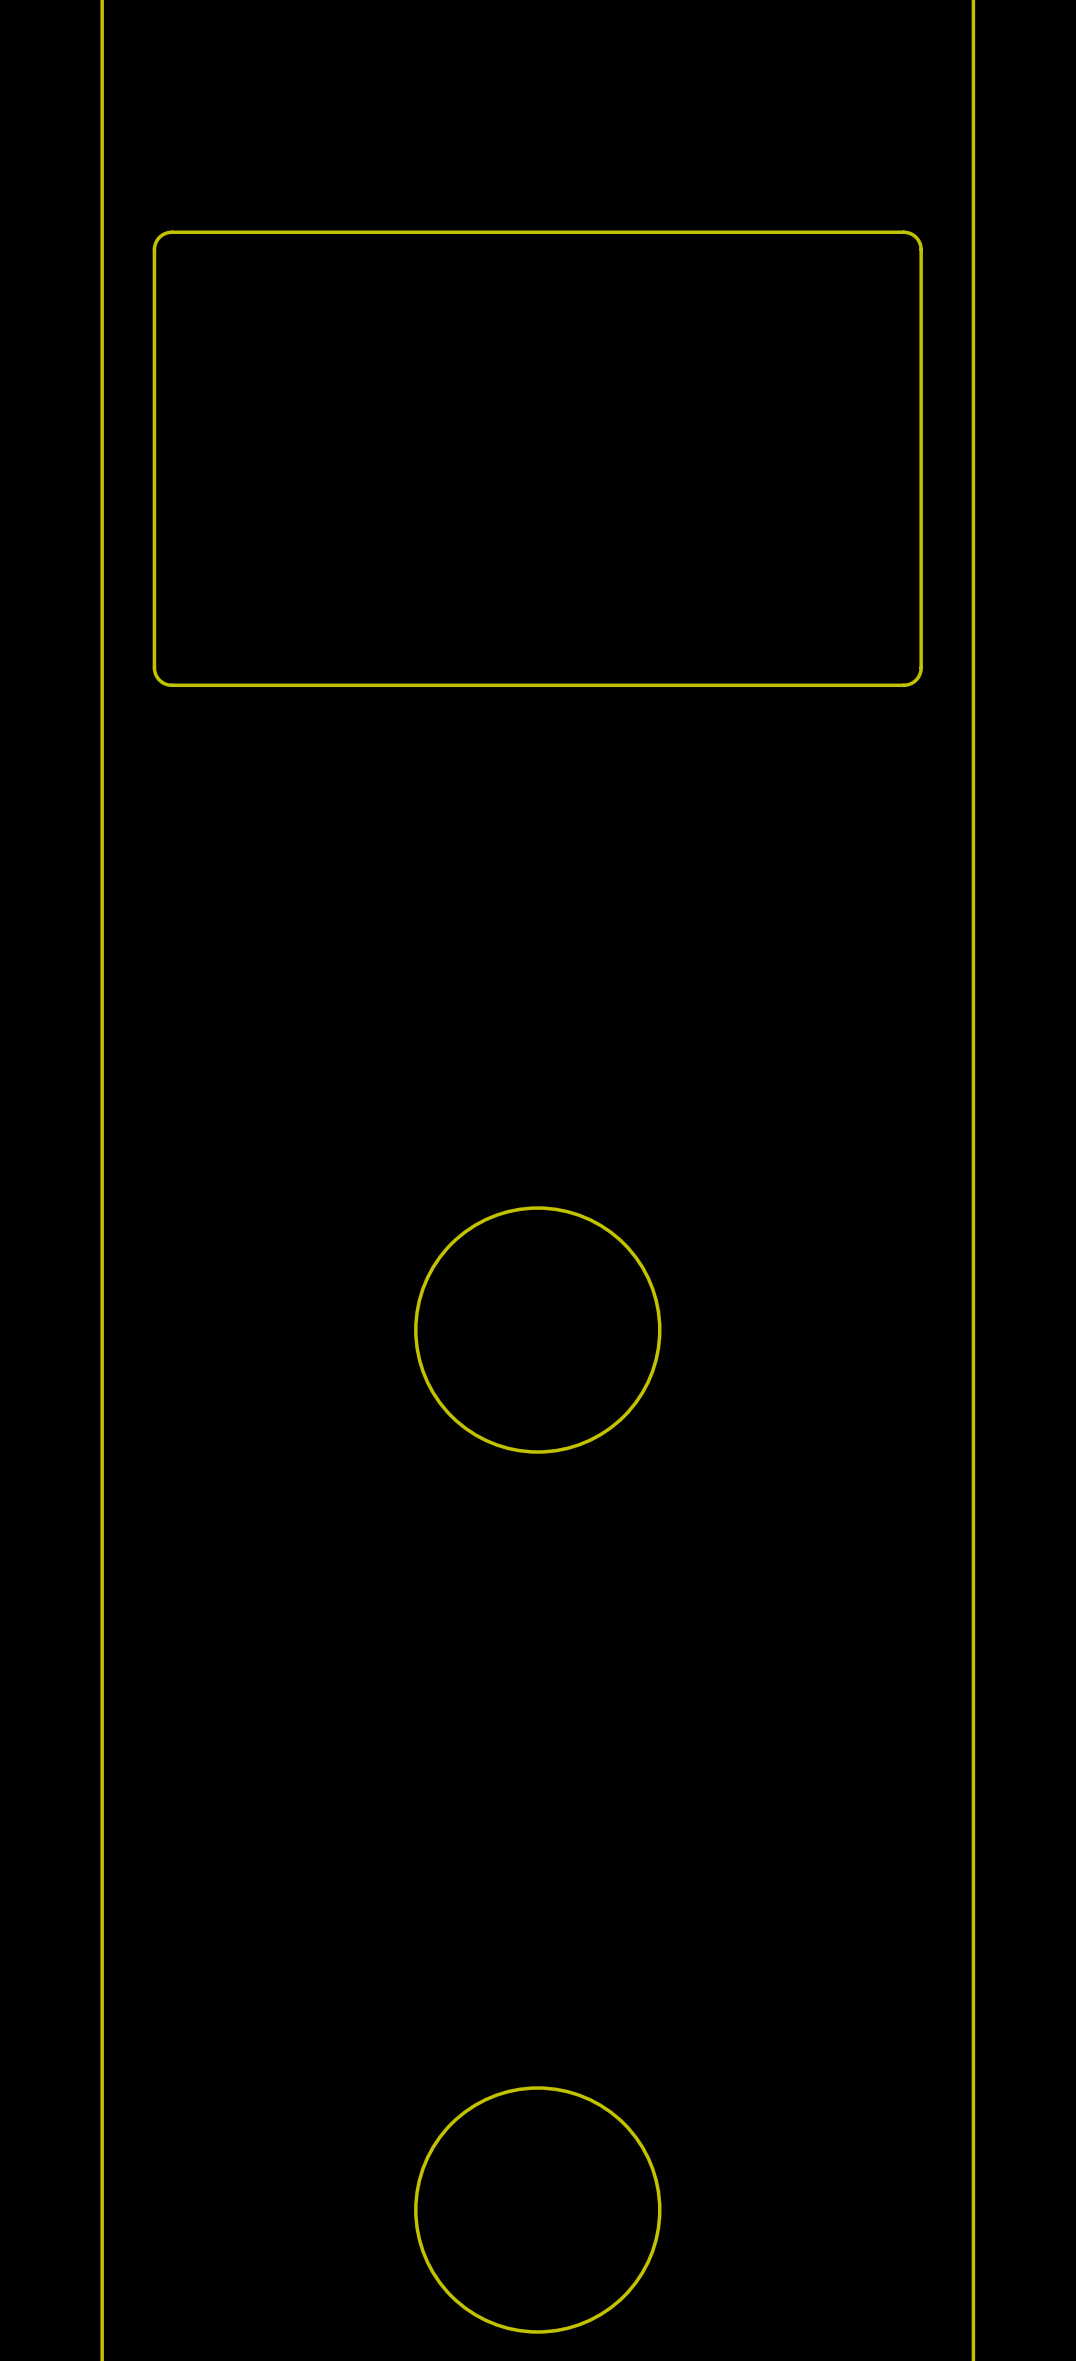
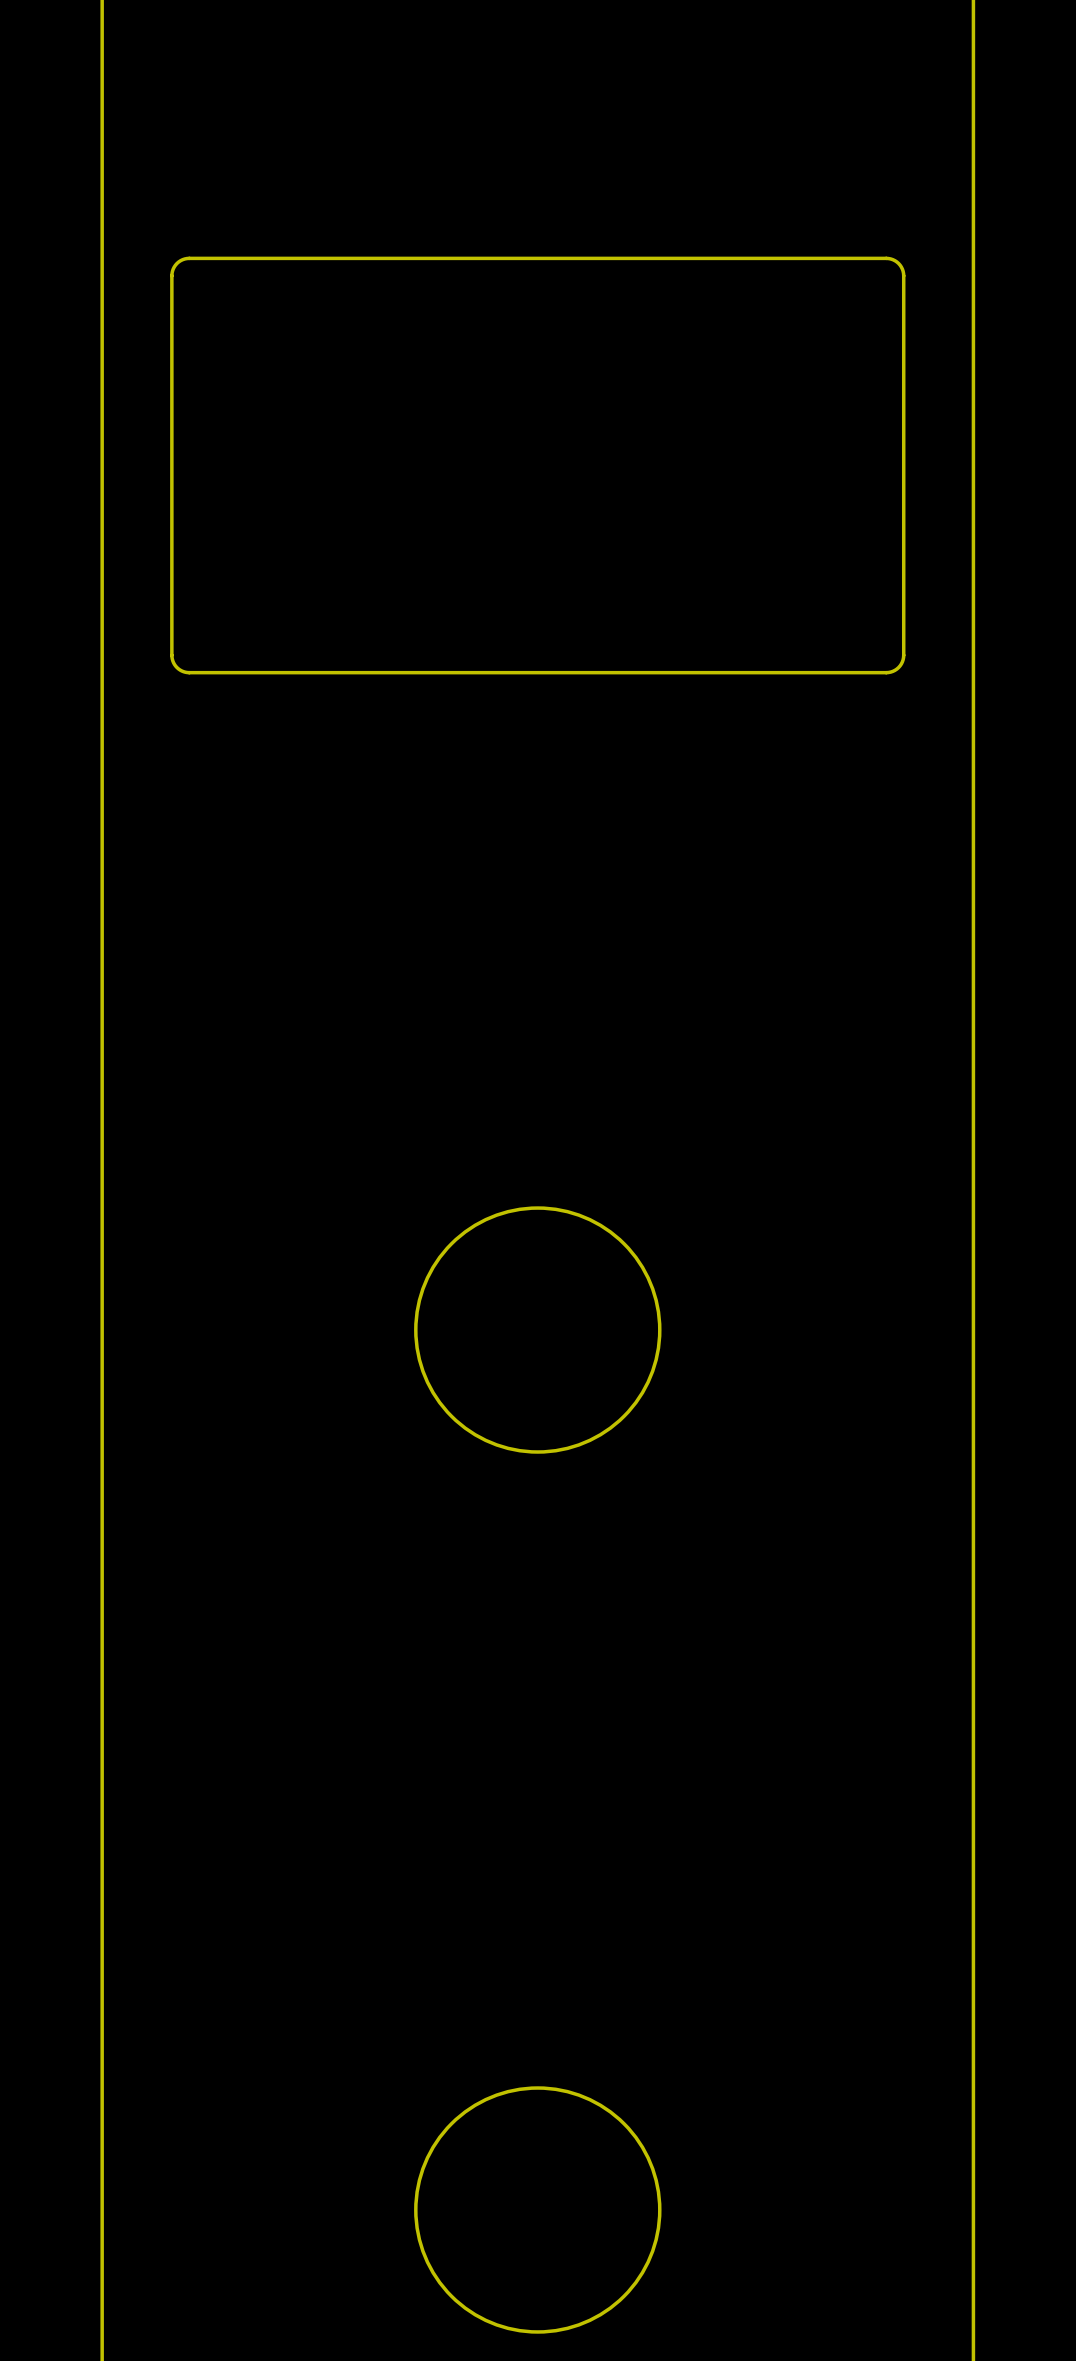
board edge: (903, 232) (171, 232) (163, 234) (156, 240) (154, 249) (154, 667) (156, 676) (163, 682) (171, 685) (903, 685) (912, 682) (918, 676) (921, 667) (921, 249) (916, 237) (903, 232) -> (886, 258) (898, 263) (903, 275) (903, 655) (901, 663) (895, 670) (886, 672) (189, 672) (180, 669) (174, 664) (171, 655) (171, 275) (174, 267) (180, 260) (189, 258) (886, 258)

